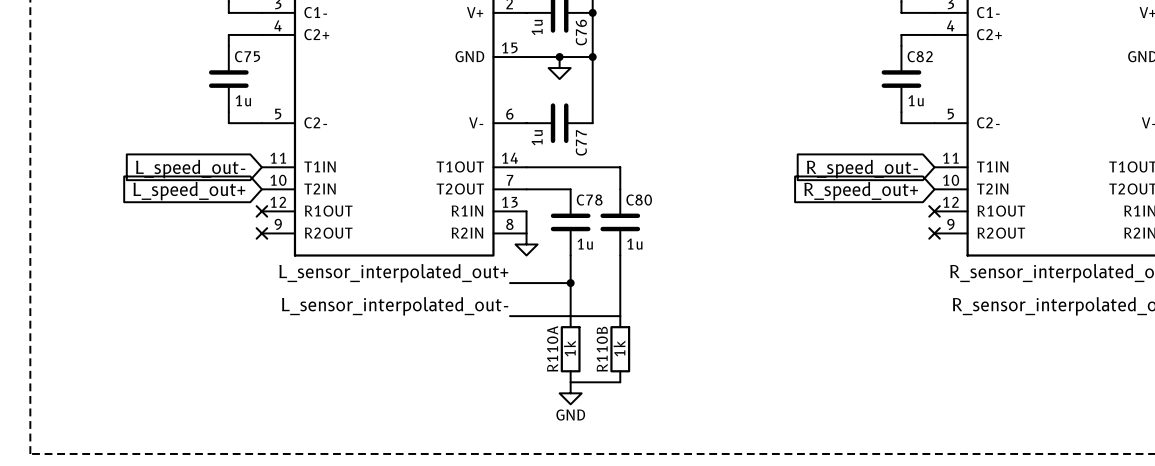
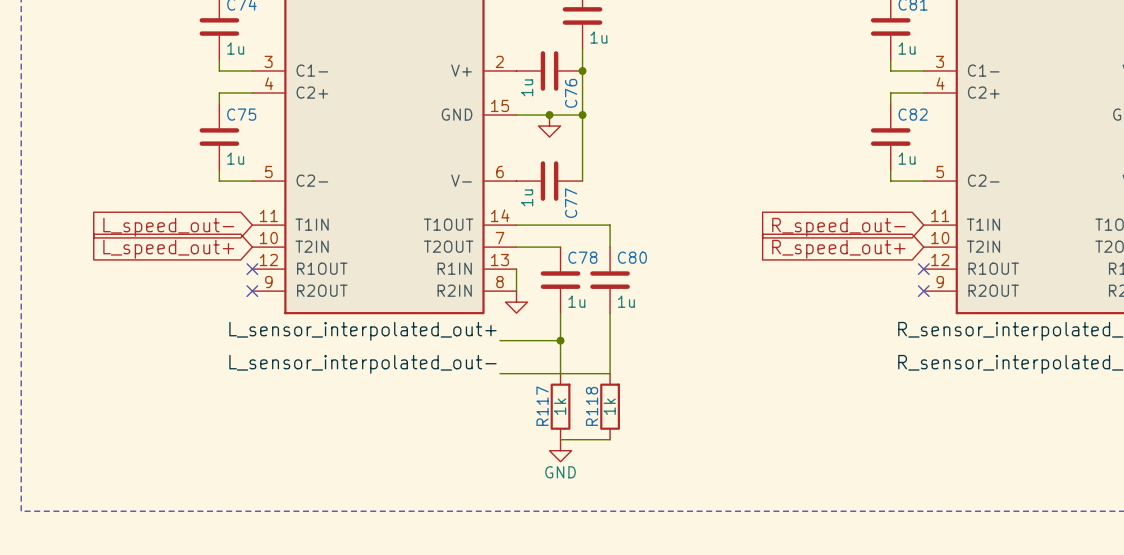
R110A name: R110A (552, 348) -> R117 (542, 406)
R110B name: R110B (602, 349) -> R118 (592, 406)

